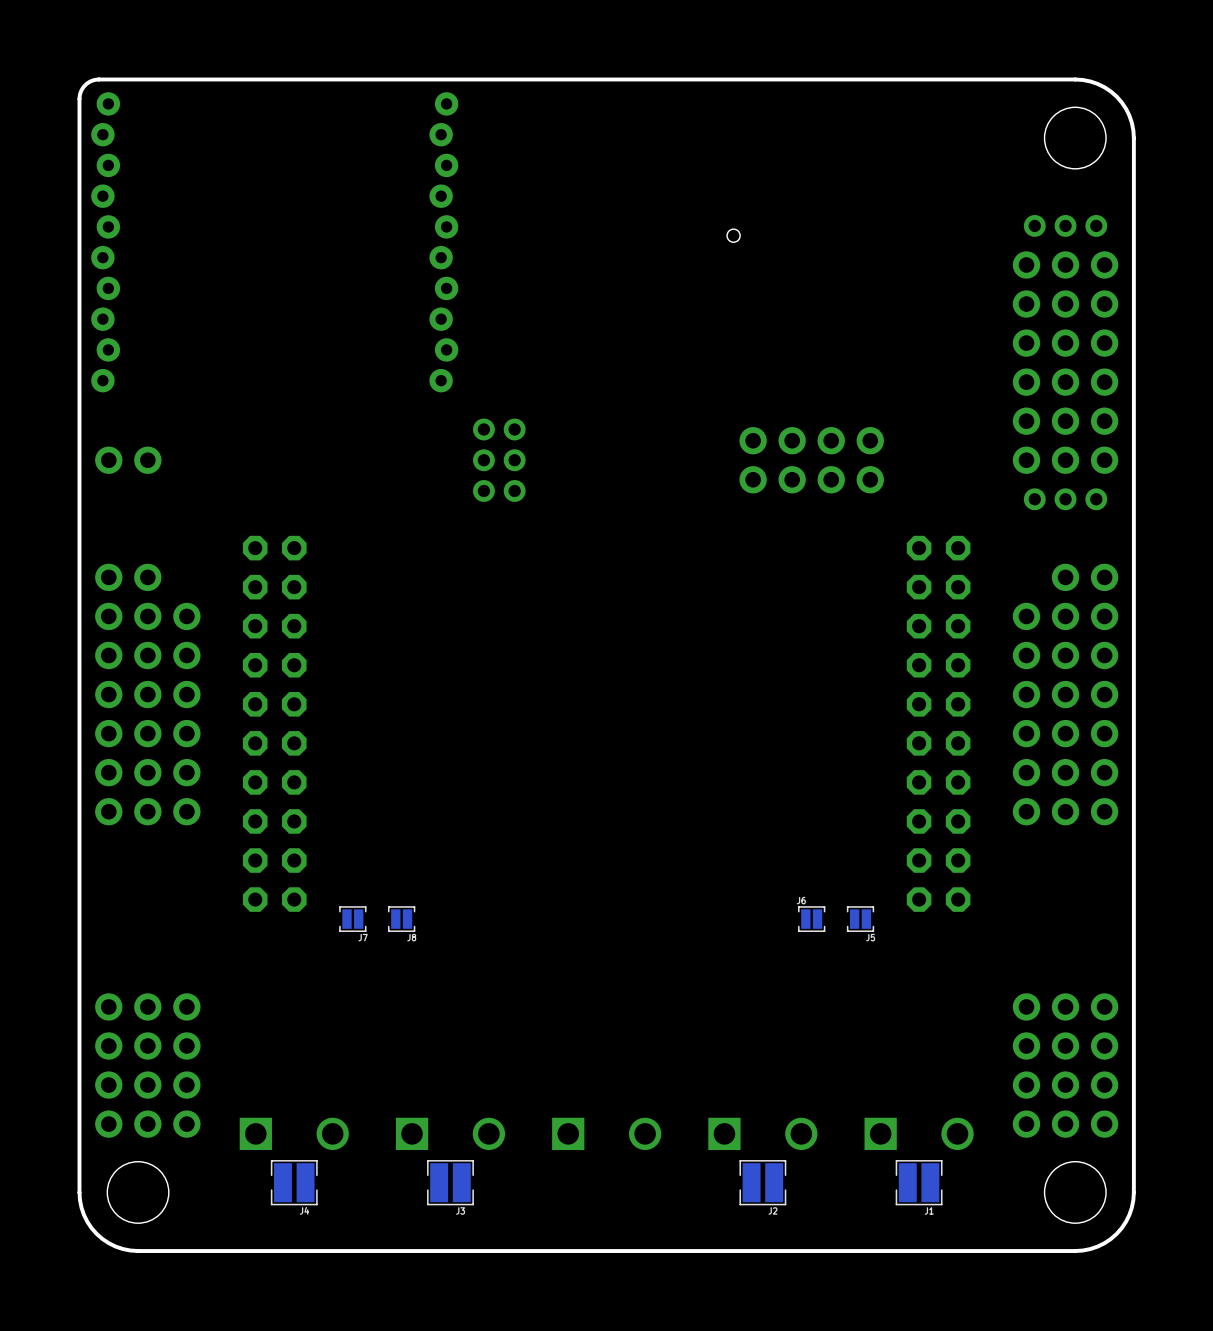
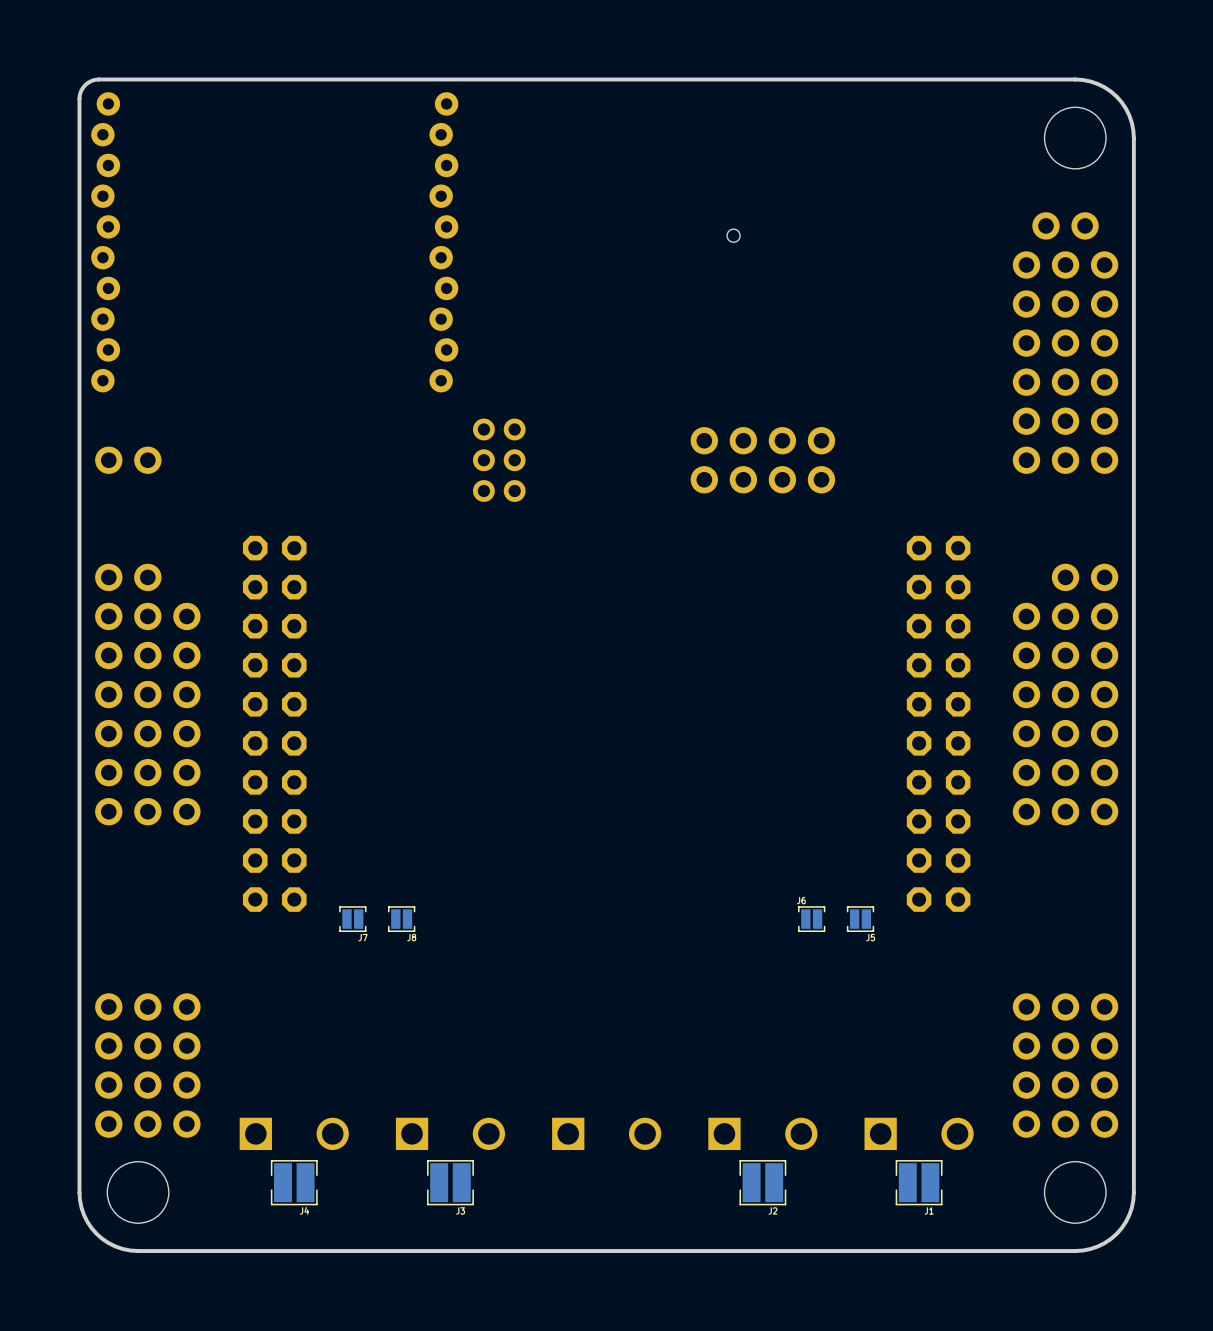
part footprint: [1023, 214, 1108, 237] -> [1032, 212, 1099, 240]
part: none -> (762, 440)
part: (811, 440) -> none
part: none -> (762, 479)
part: (811, 479) -> none
part: (1065, 499) -> none

